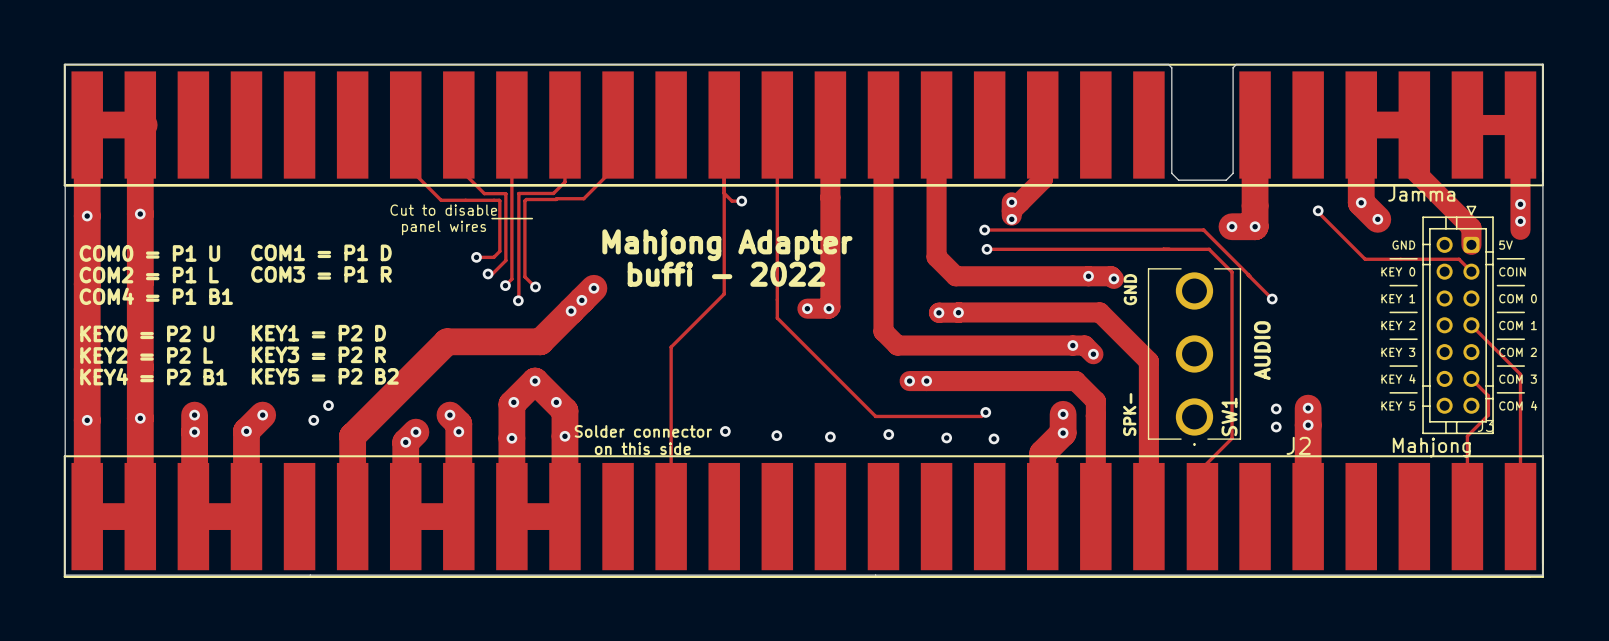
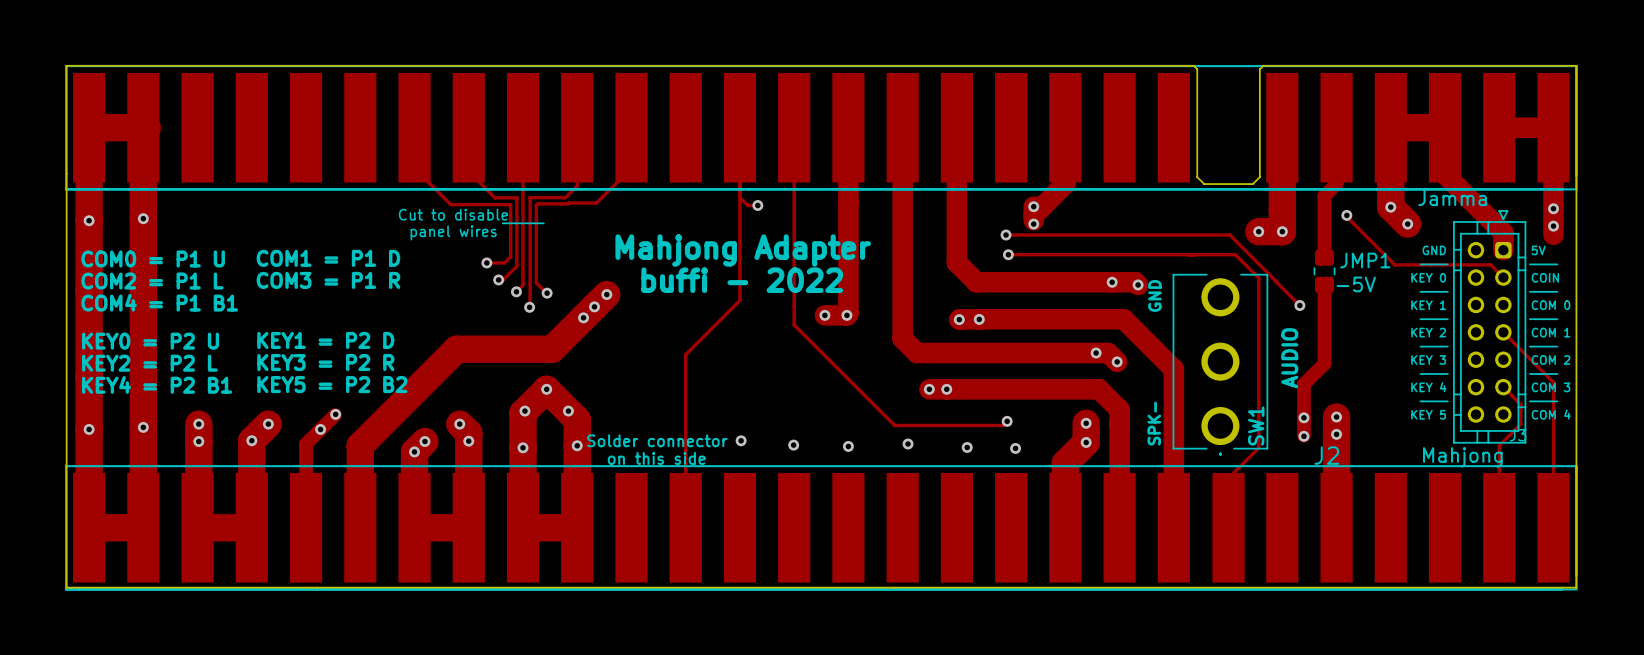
track: none -> (1336, 127) (1336, 183) (1324, 195) (1324, 257)
JMP1: none -> (1324, 271)
track: none -> (1324, 284) (1324, 363) (1303, 384) (1303, 435)
text: none -> -5V (1356, 284)
track: none -> (334, 415) (306, 443) (306, 527)

